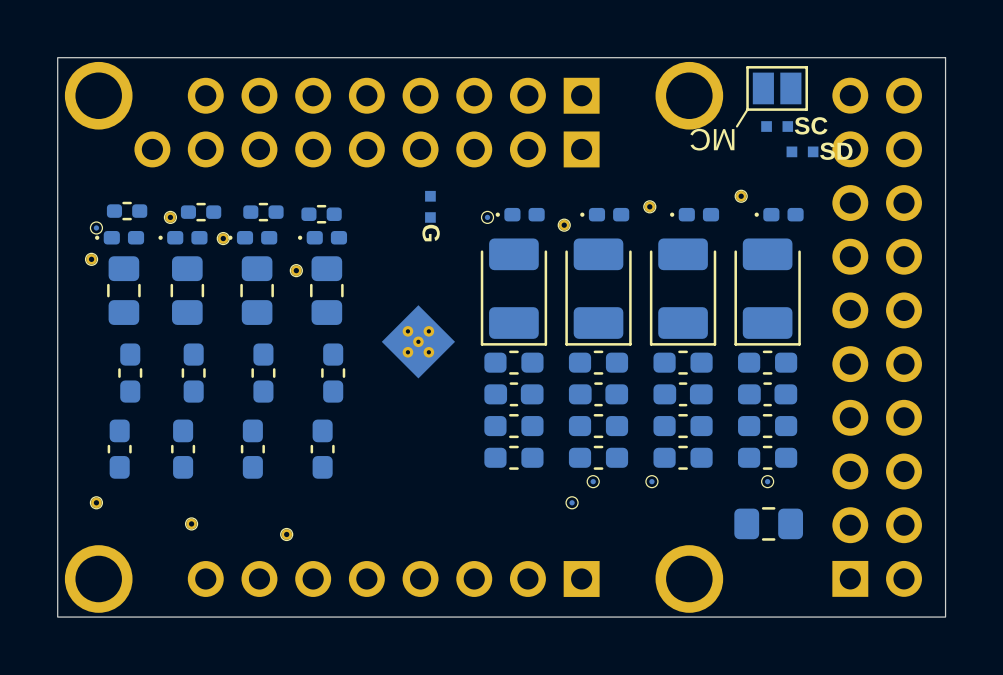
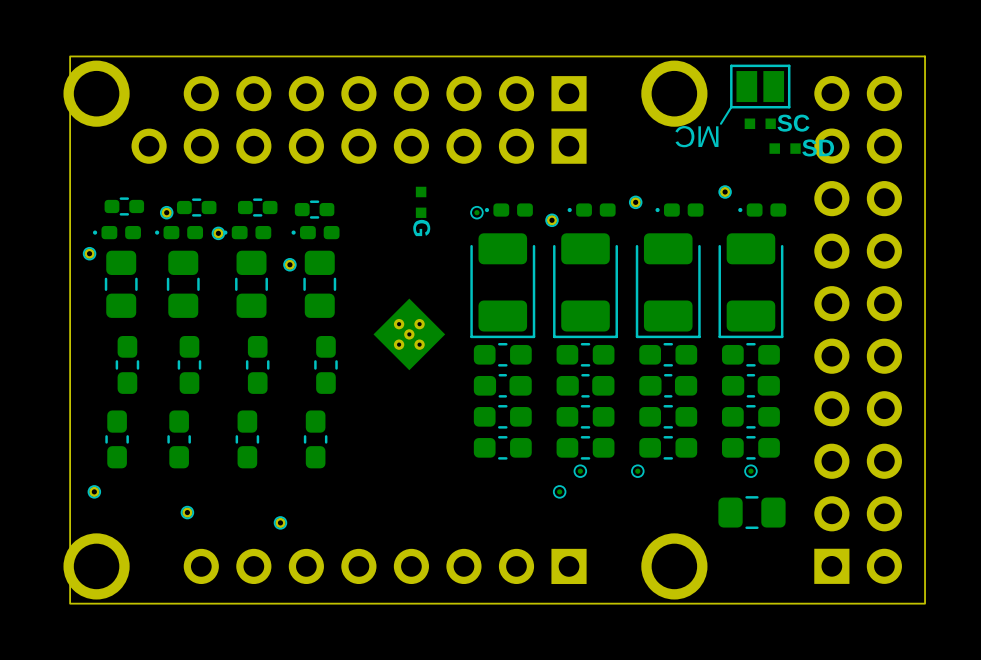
part footprint: [57, 57, 947, 618] -> [63, 55, 926, 605]
part: (96, 227) -> none

